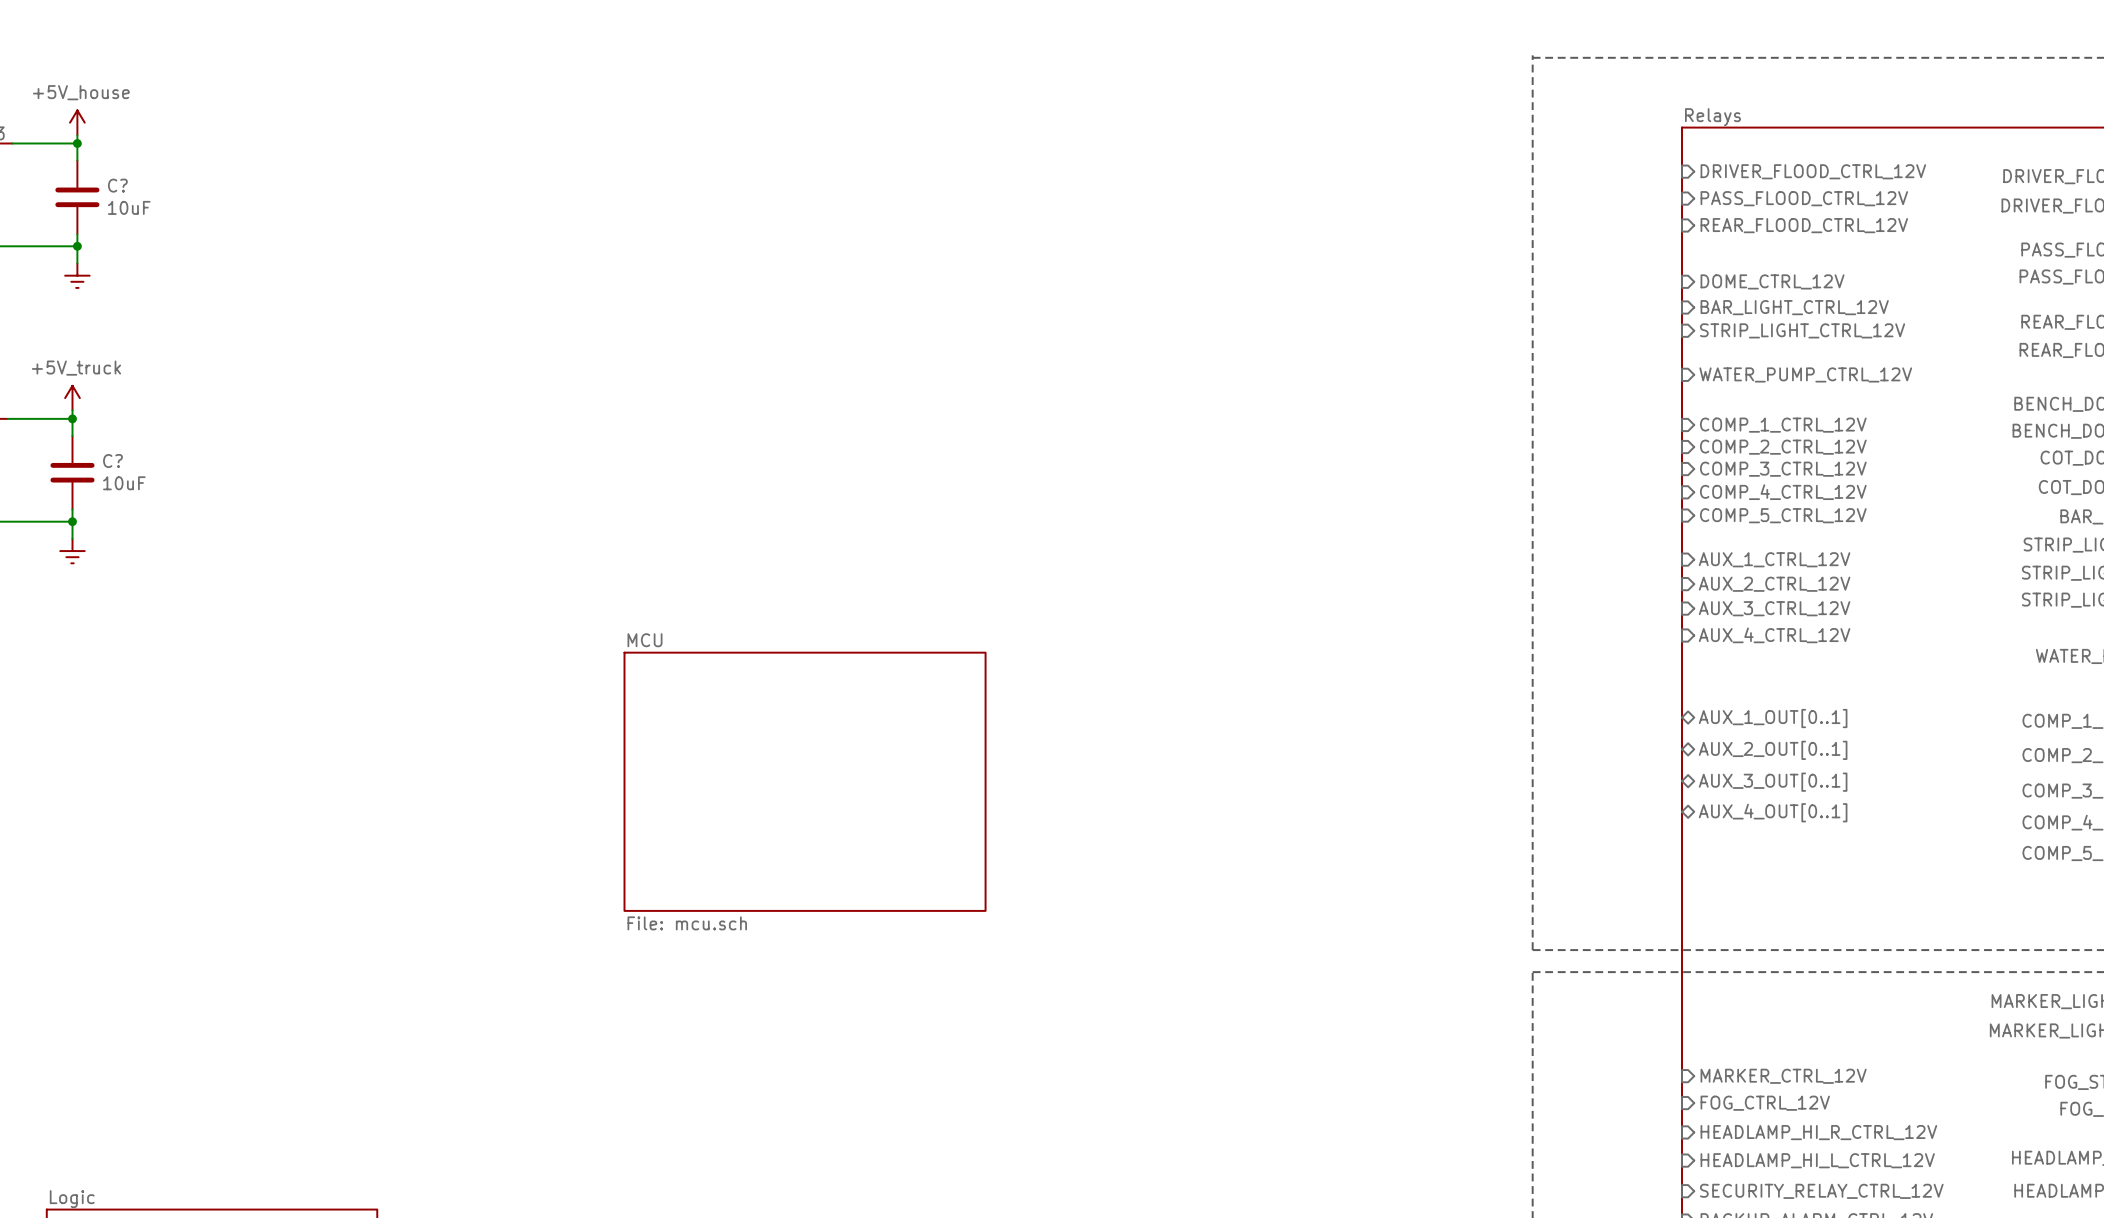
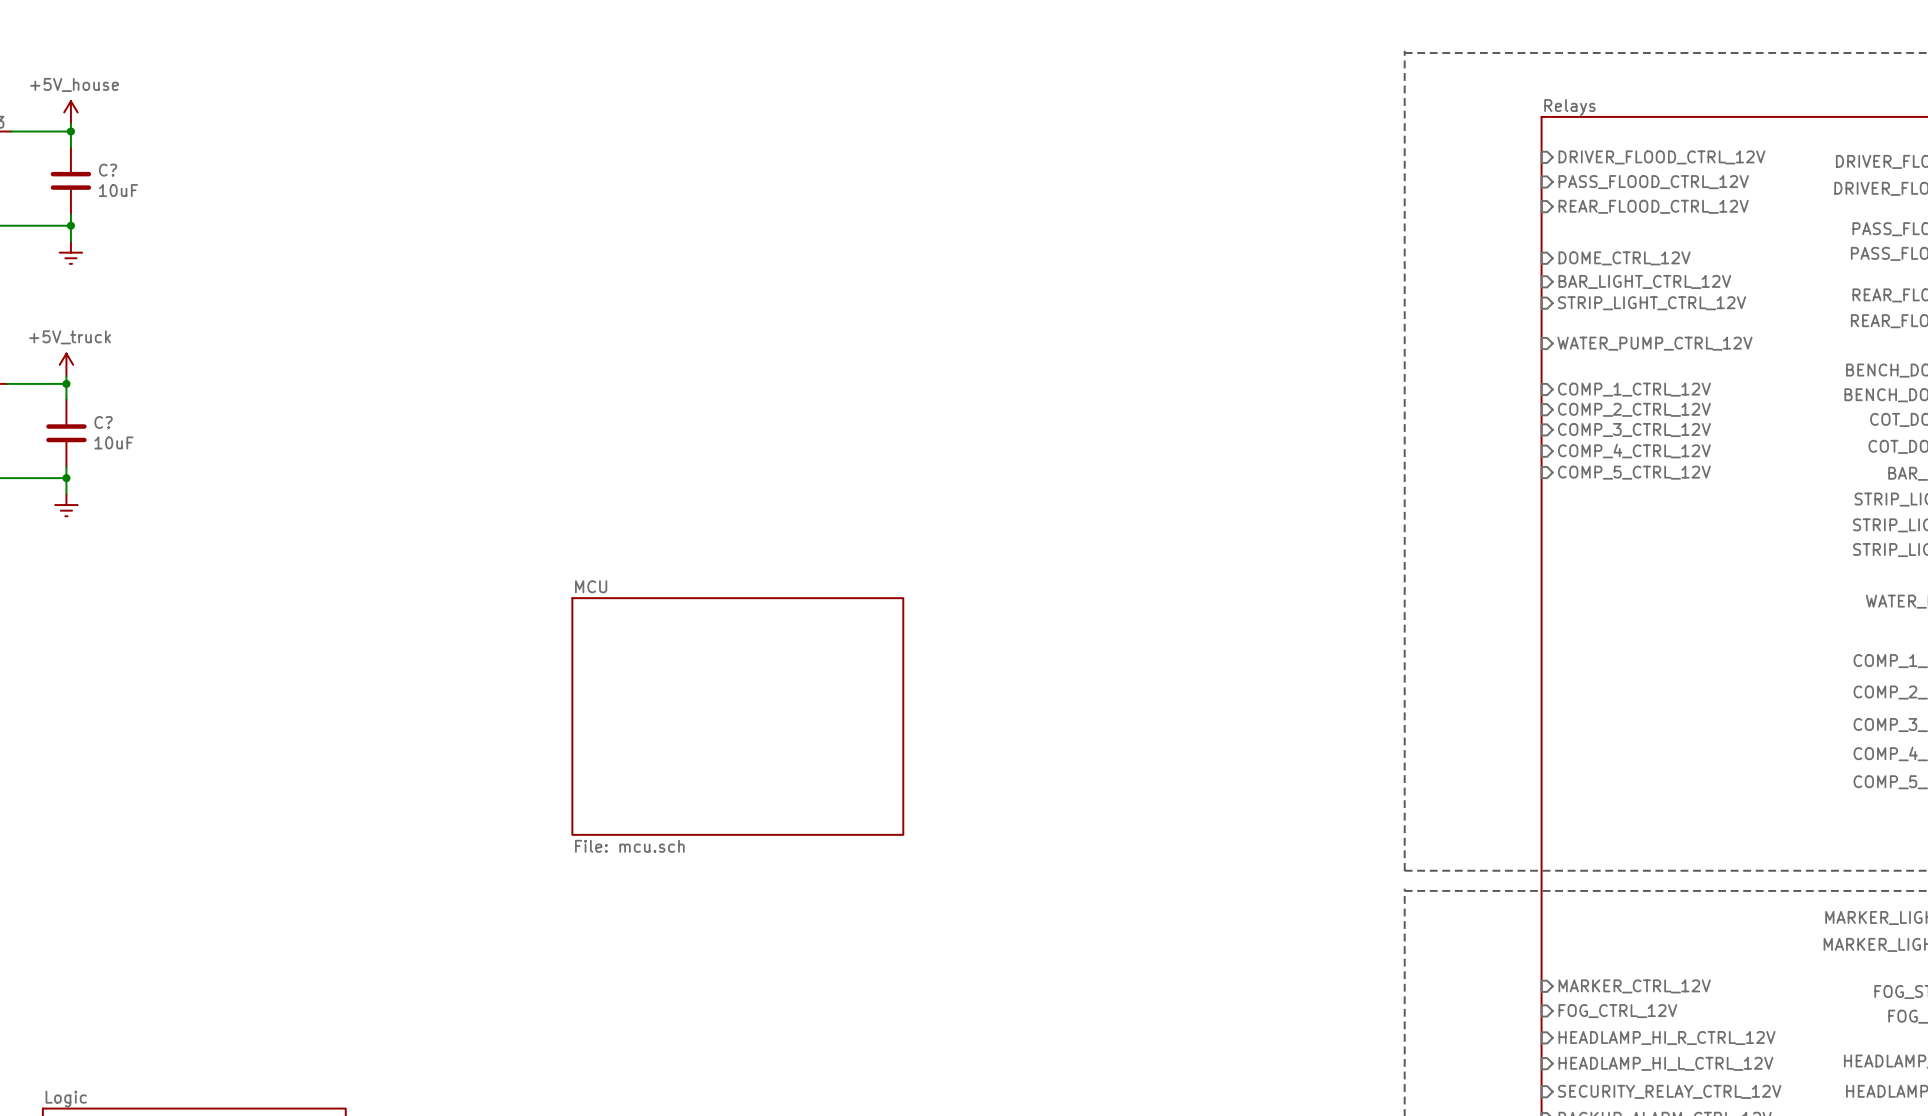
sheet pin: AUX_1_CTRL_12V (1774, 559) -> none
sheet pin: AUX_2_CTRL_12V (1774, 584) -> none
sheet pin: AUX_3_CTRL_12V (1774, 608) -> none
sheet pin: AUX_4_CTRL_12V (1774, 635) -> none
sheet pin: AUX_1_OUT[0..1] (1773, 718) -> none
sheet pin: AUX_2_OUT[0..1] (1773, 750) -> none
sheet pin: AUX_3_OUT[0..1] (1773, 782) -> none
sheet pin: AUX_4_OUT[0..1] (1773, 812) -> none

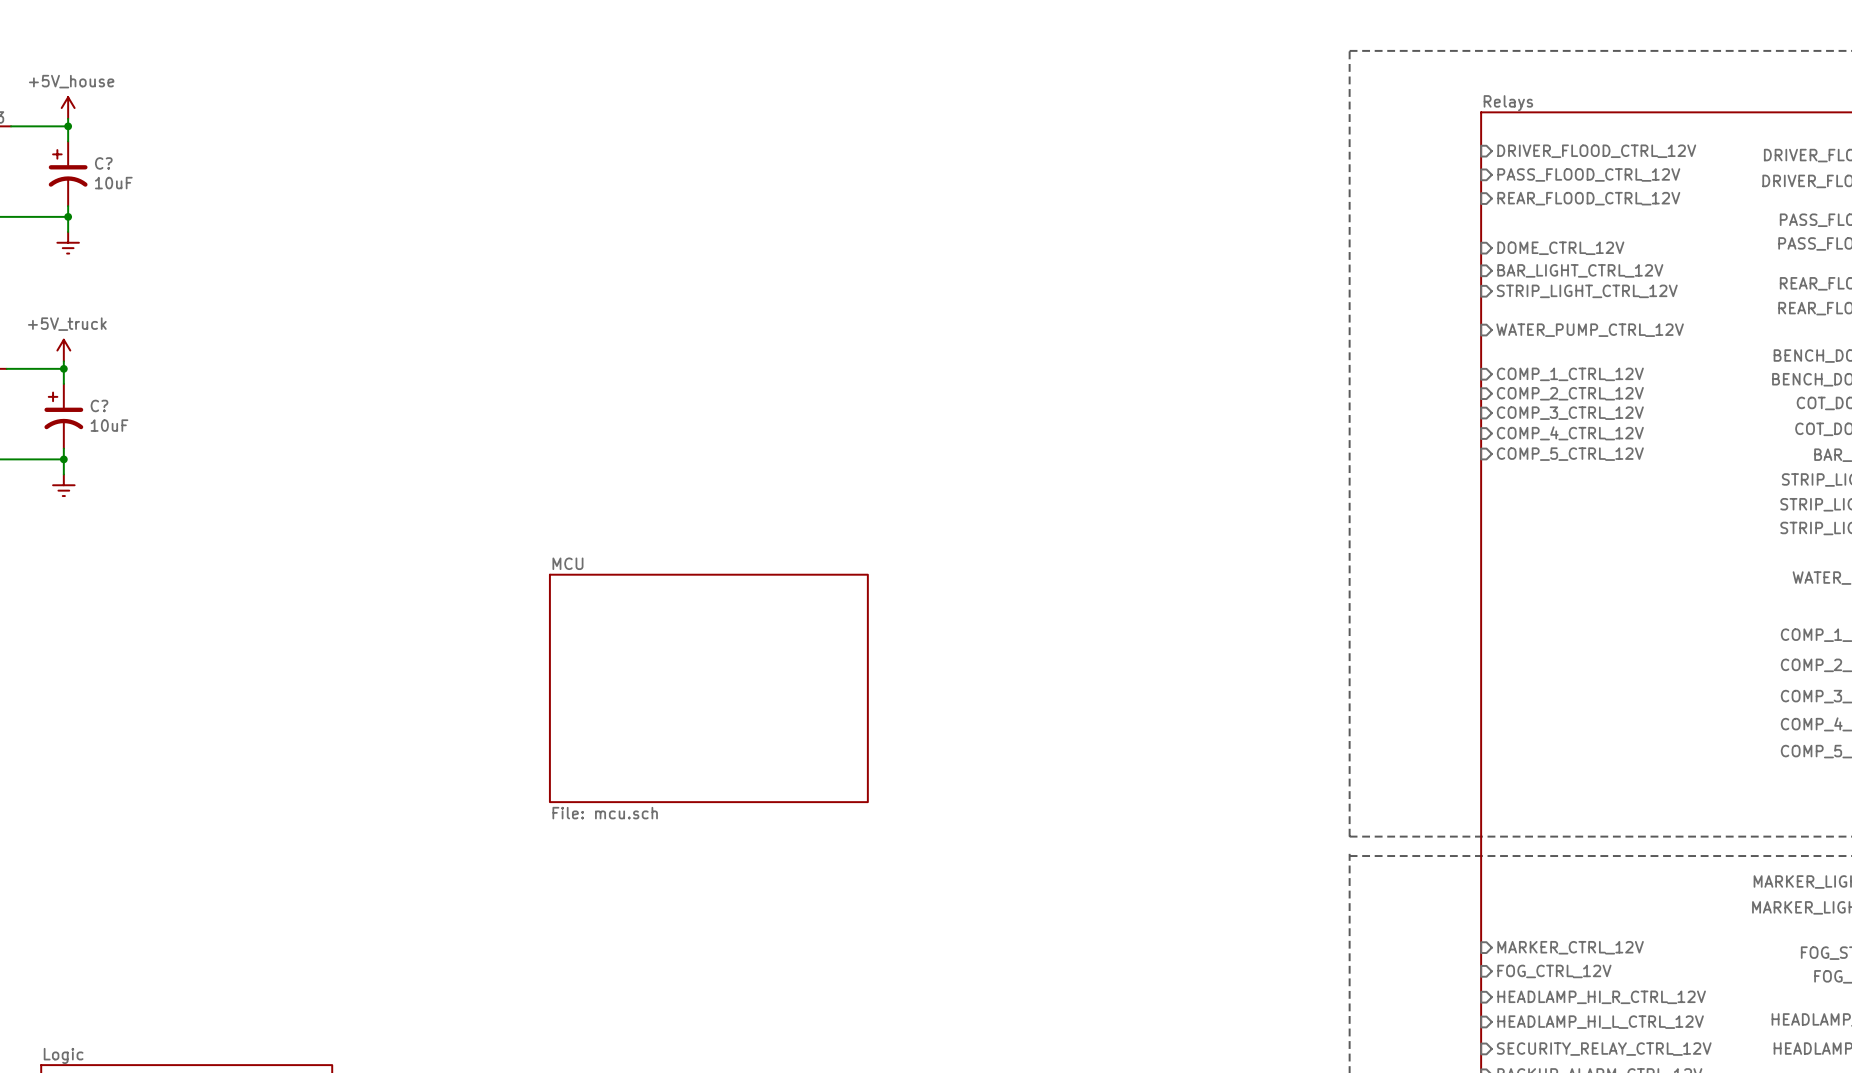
C? symbol: [50, 147, 92, 215] -> [48, 141, 88, 207]
C? symbol: [46, 399, 87, 467] -> [44, 383, 84, 449]

